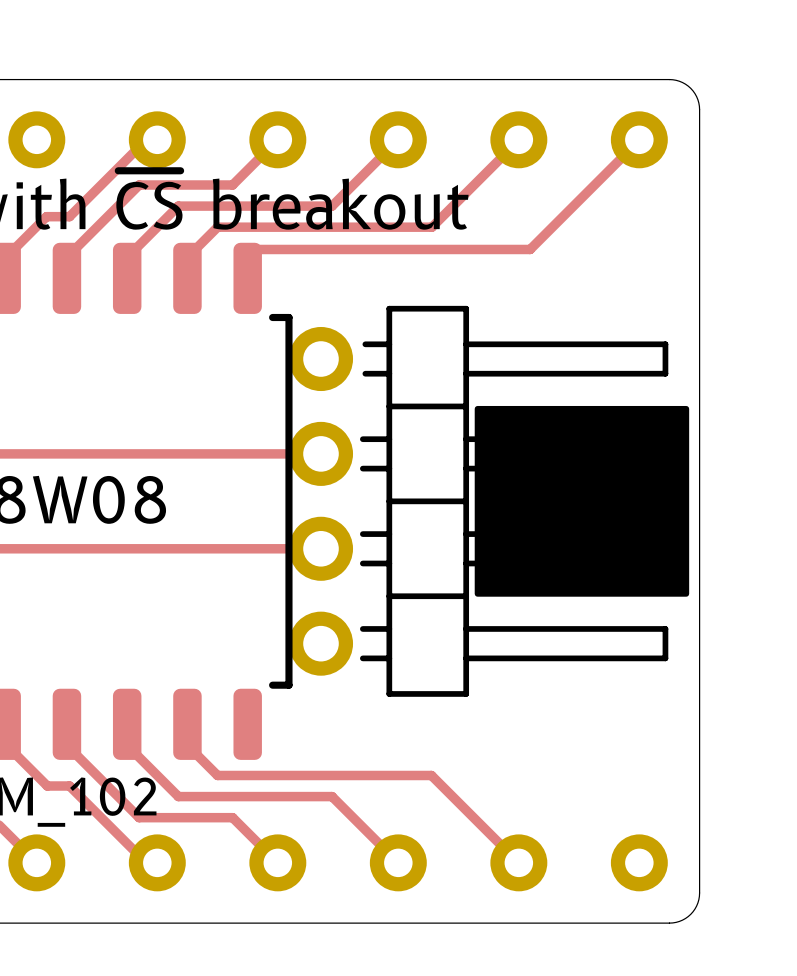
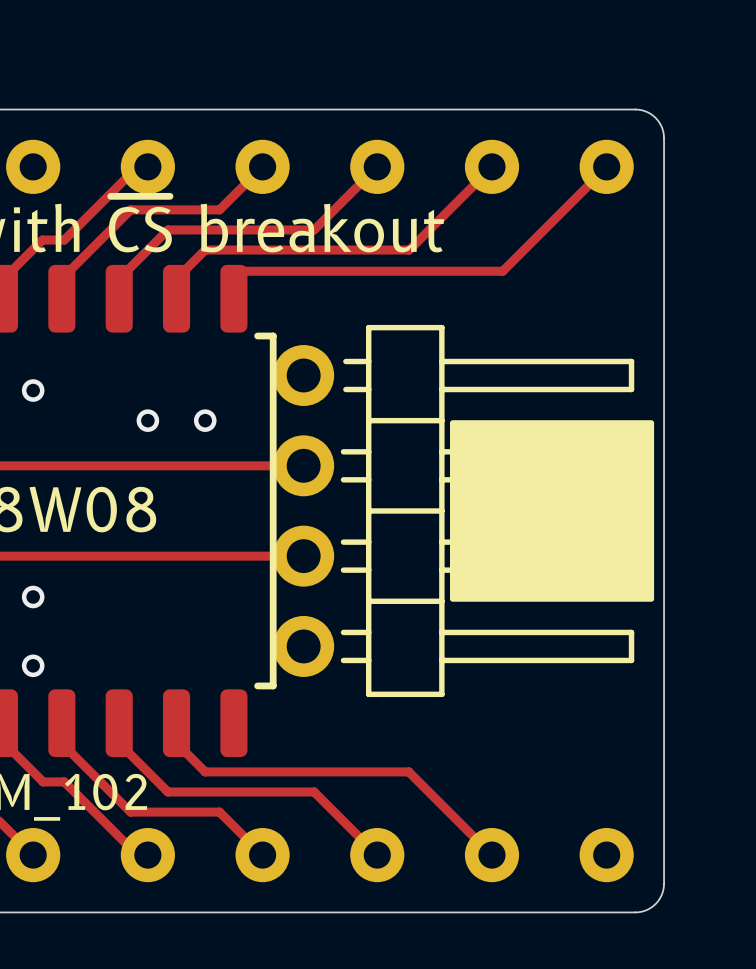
via: none -> (33, 390)
via: none -> (147, 420)
via: none -> (205, 420)
via: none -> (33, 597)
via: none -> (33, 665)

